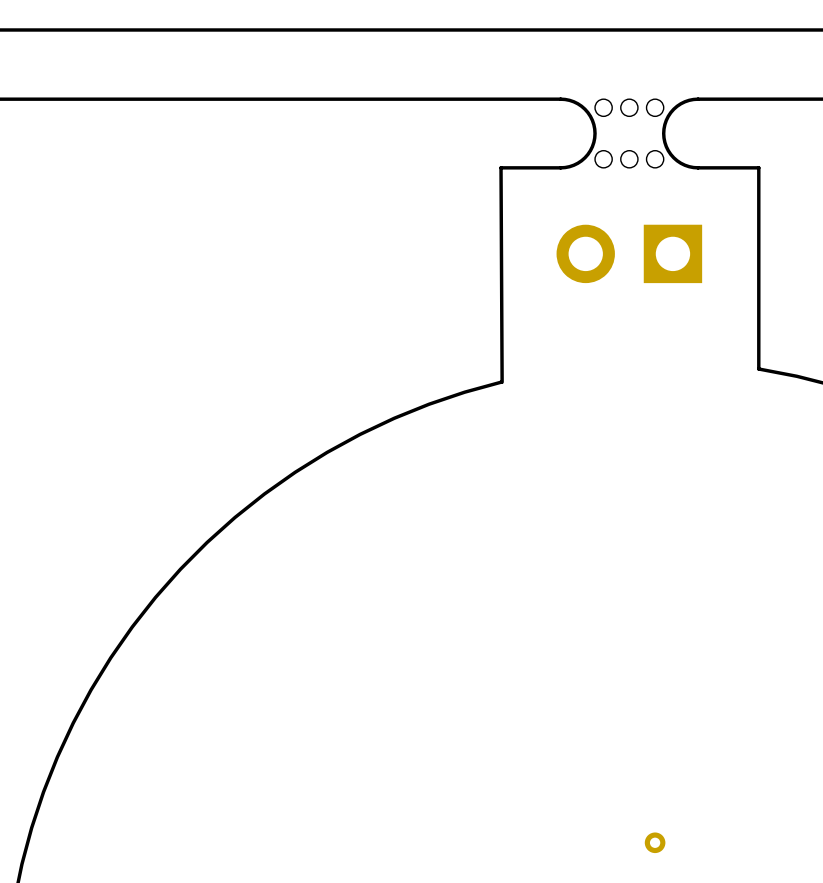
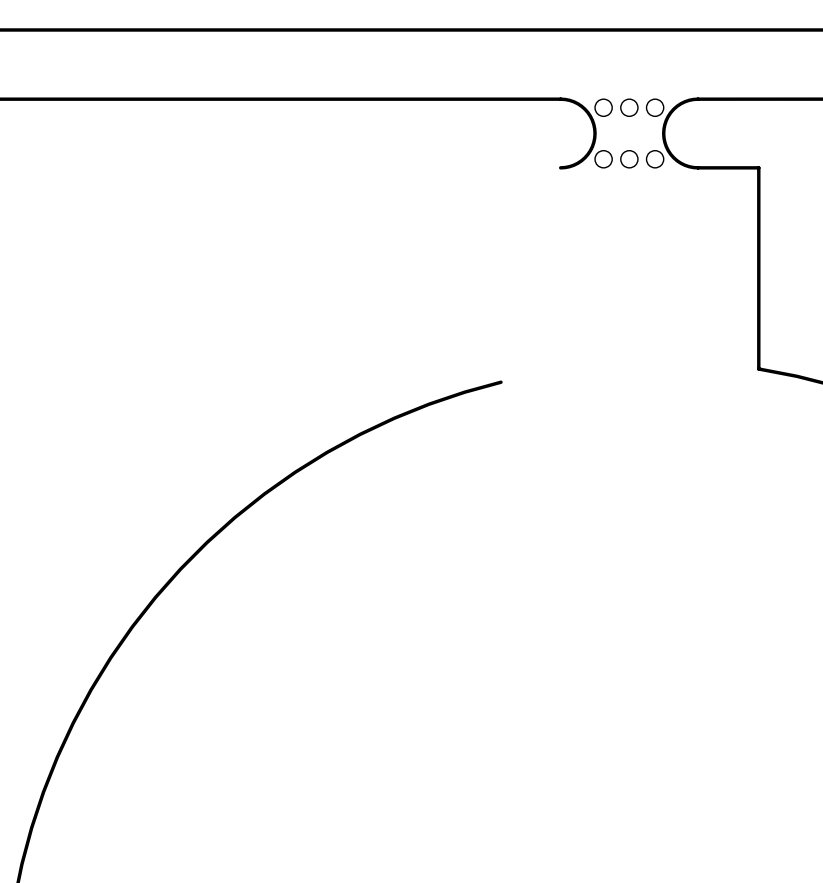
board edge: (560, 167) (501, 167) (502, 382) -> none
part: (629, 253) -> none
part: (655, 842) -> none

